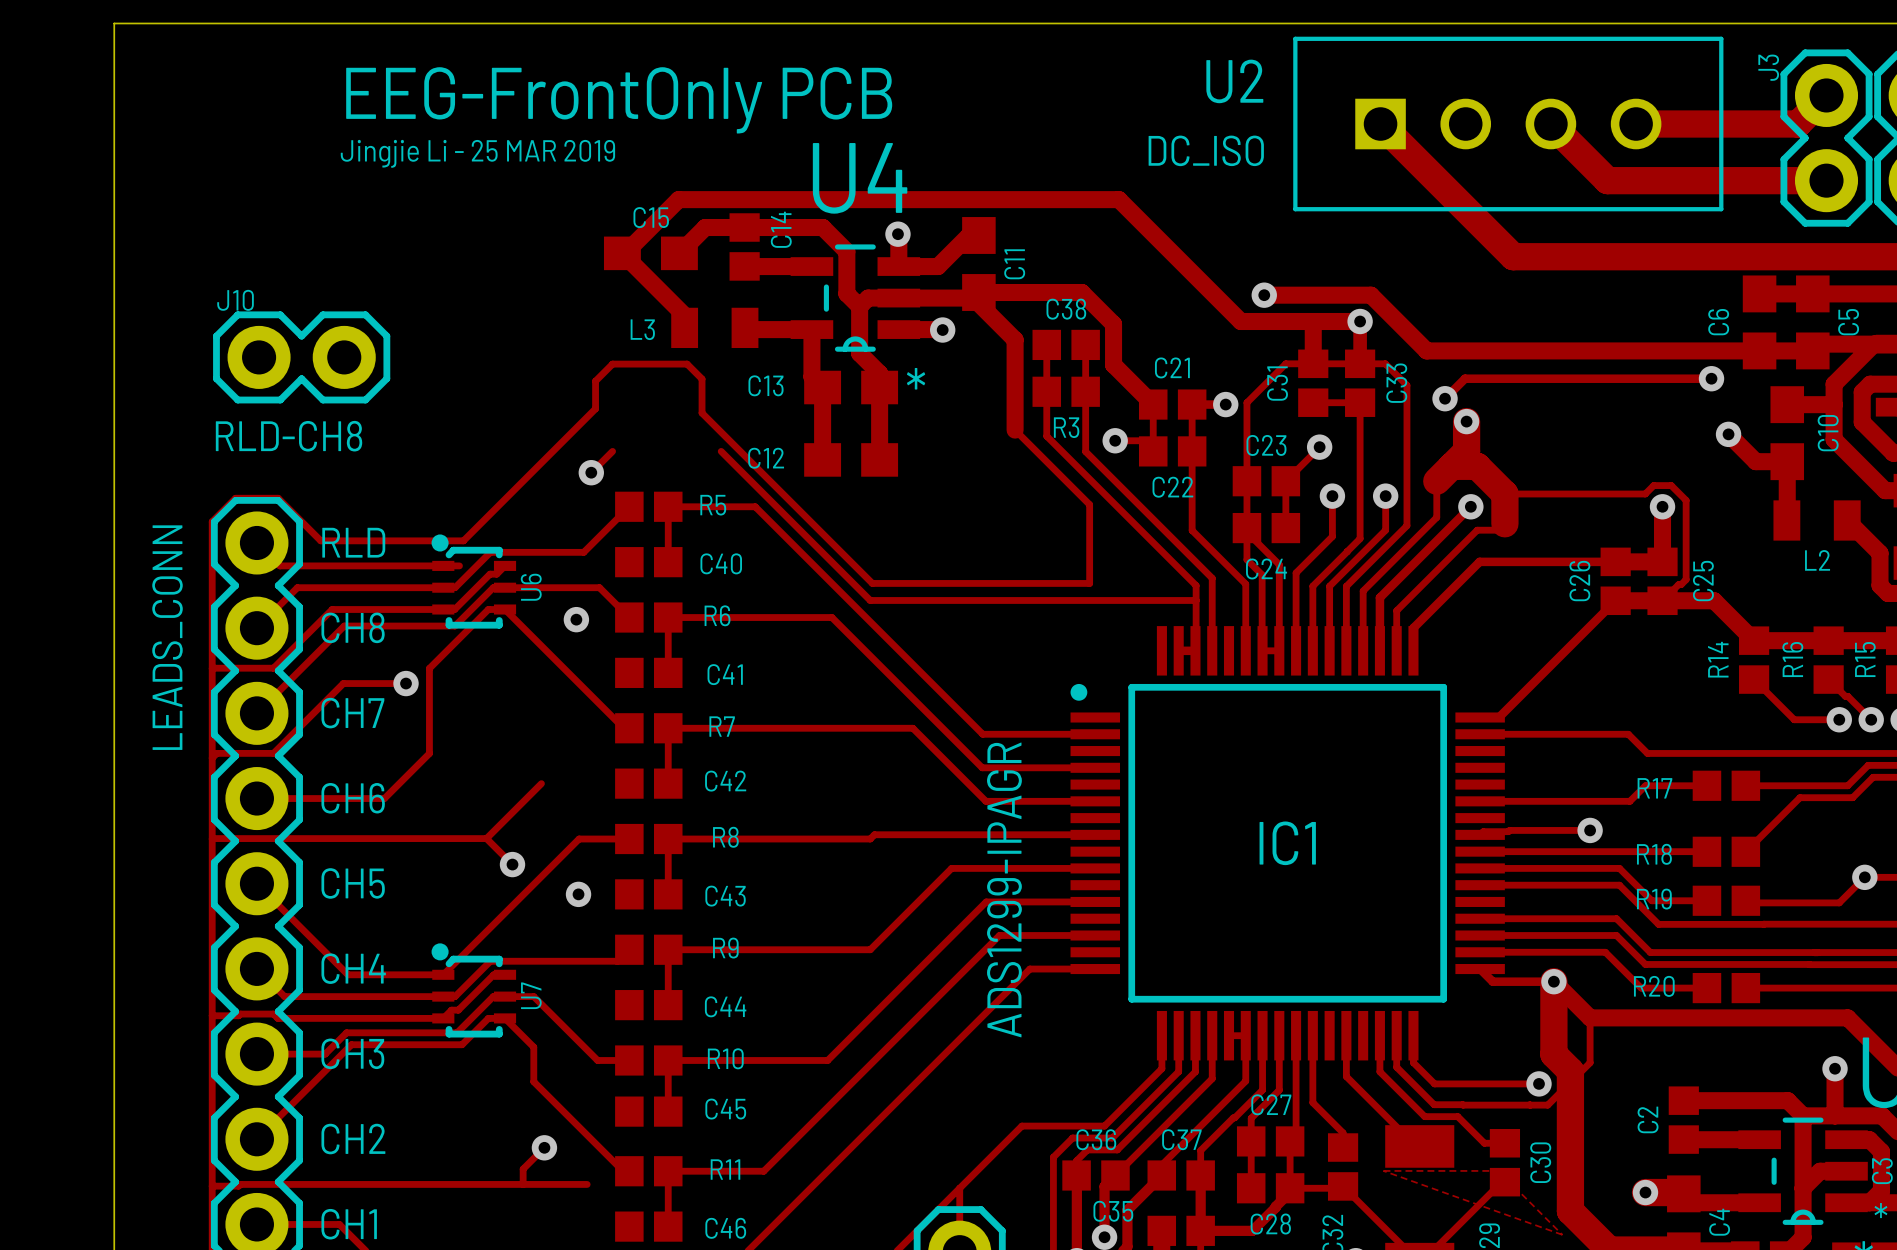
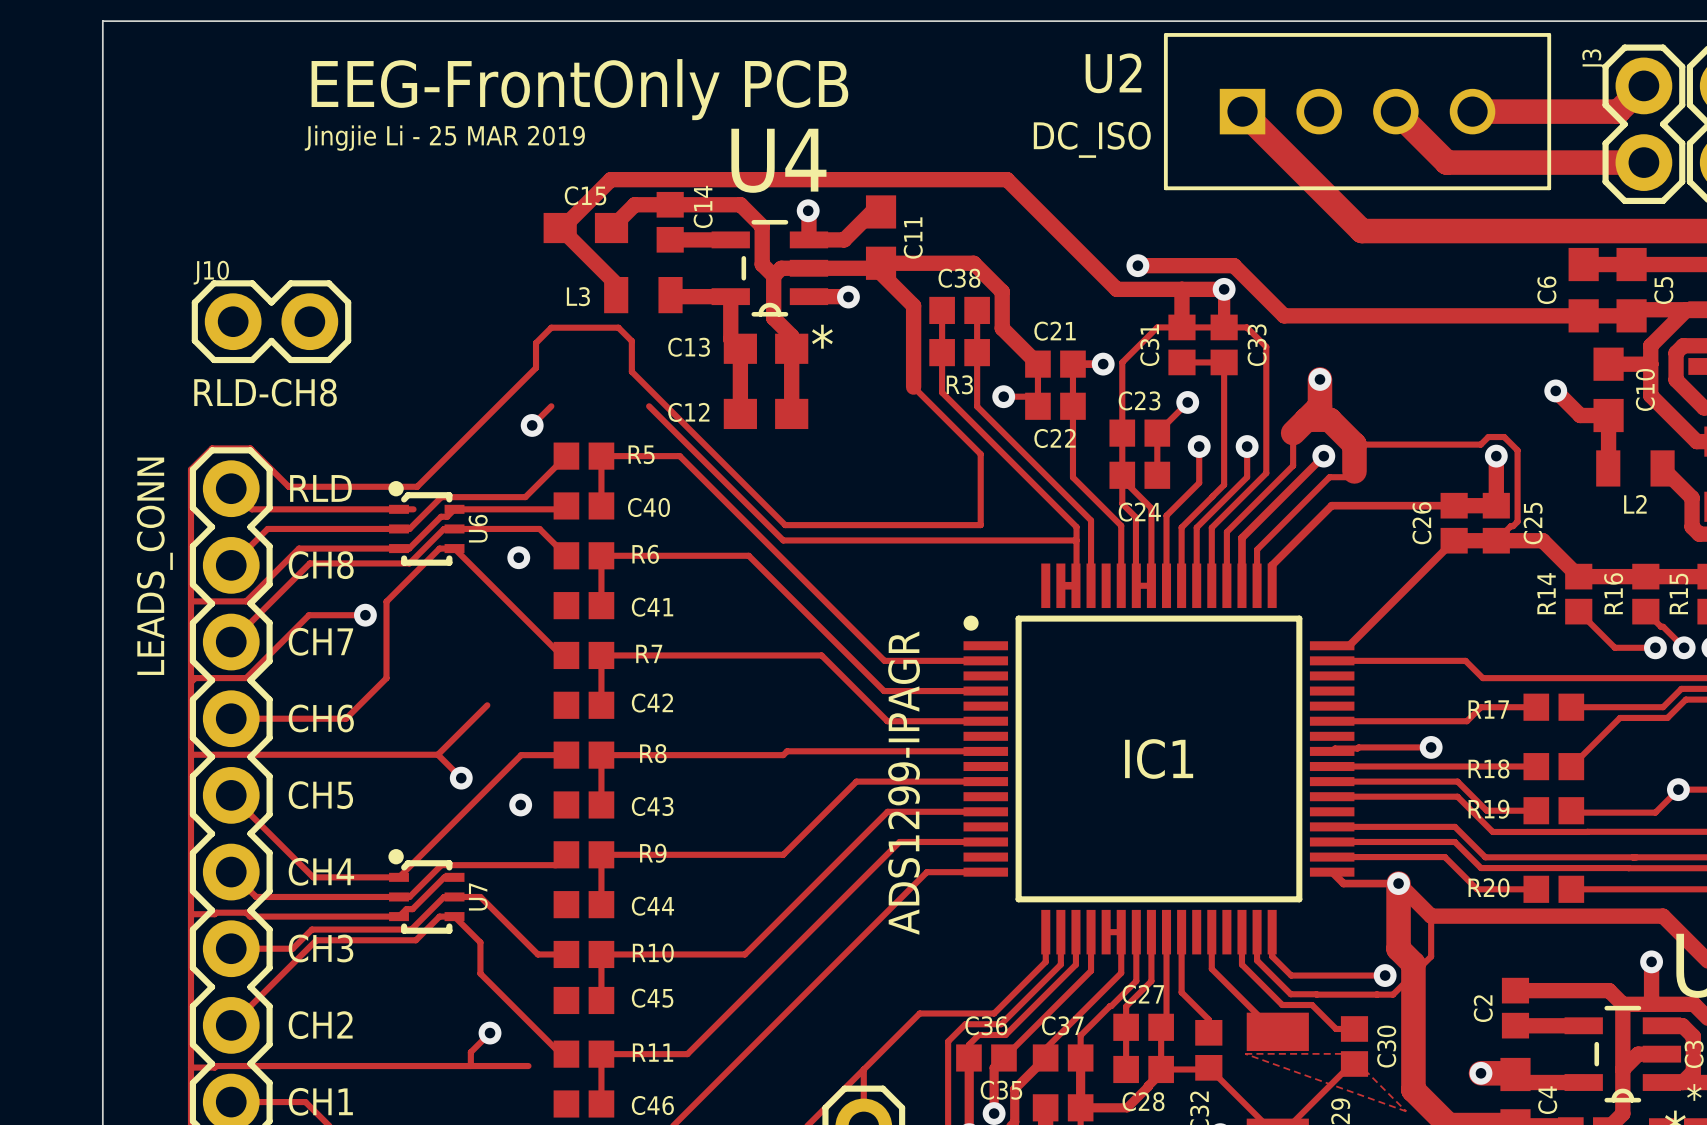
track: (1711, 378) (1465, 378) (1445, 398) -> none
via: (1711, 378) -> none
via: (1445, 398) -> none
track: none -> (454, 509) (563, 509)

